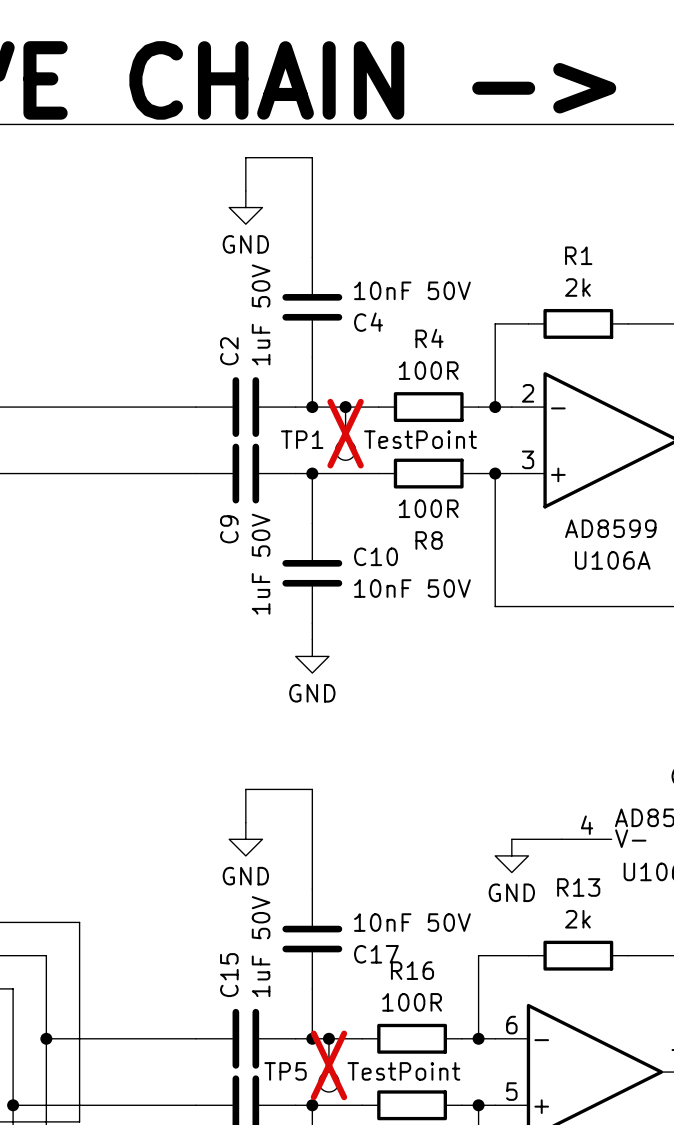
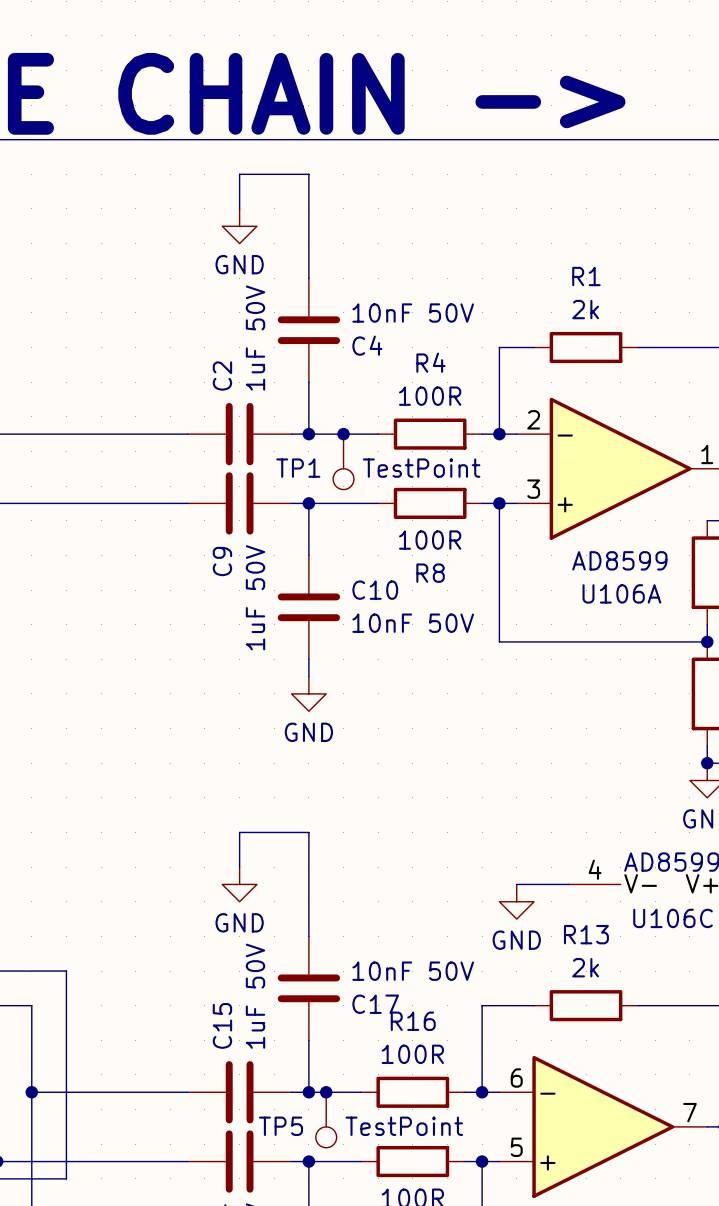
TP1 do-not-place cross: (345, 433) -> none
TP5 do-not-place cross: (328, 1065) -> none

